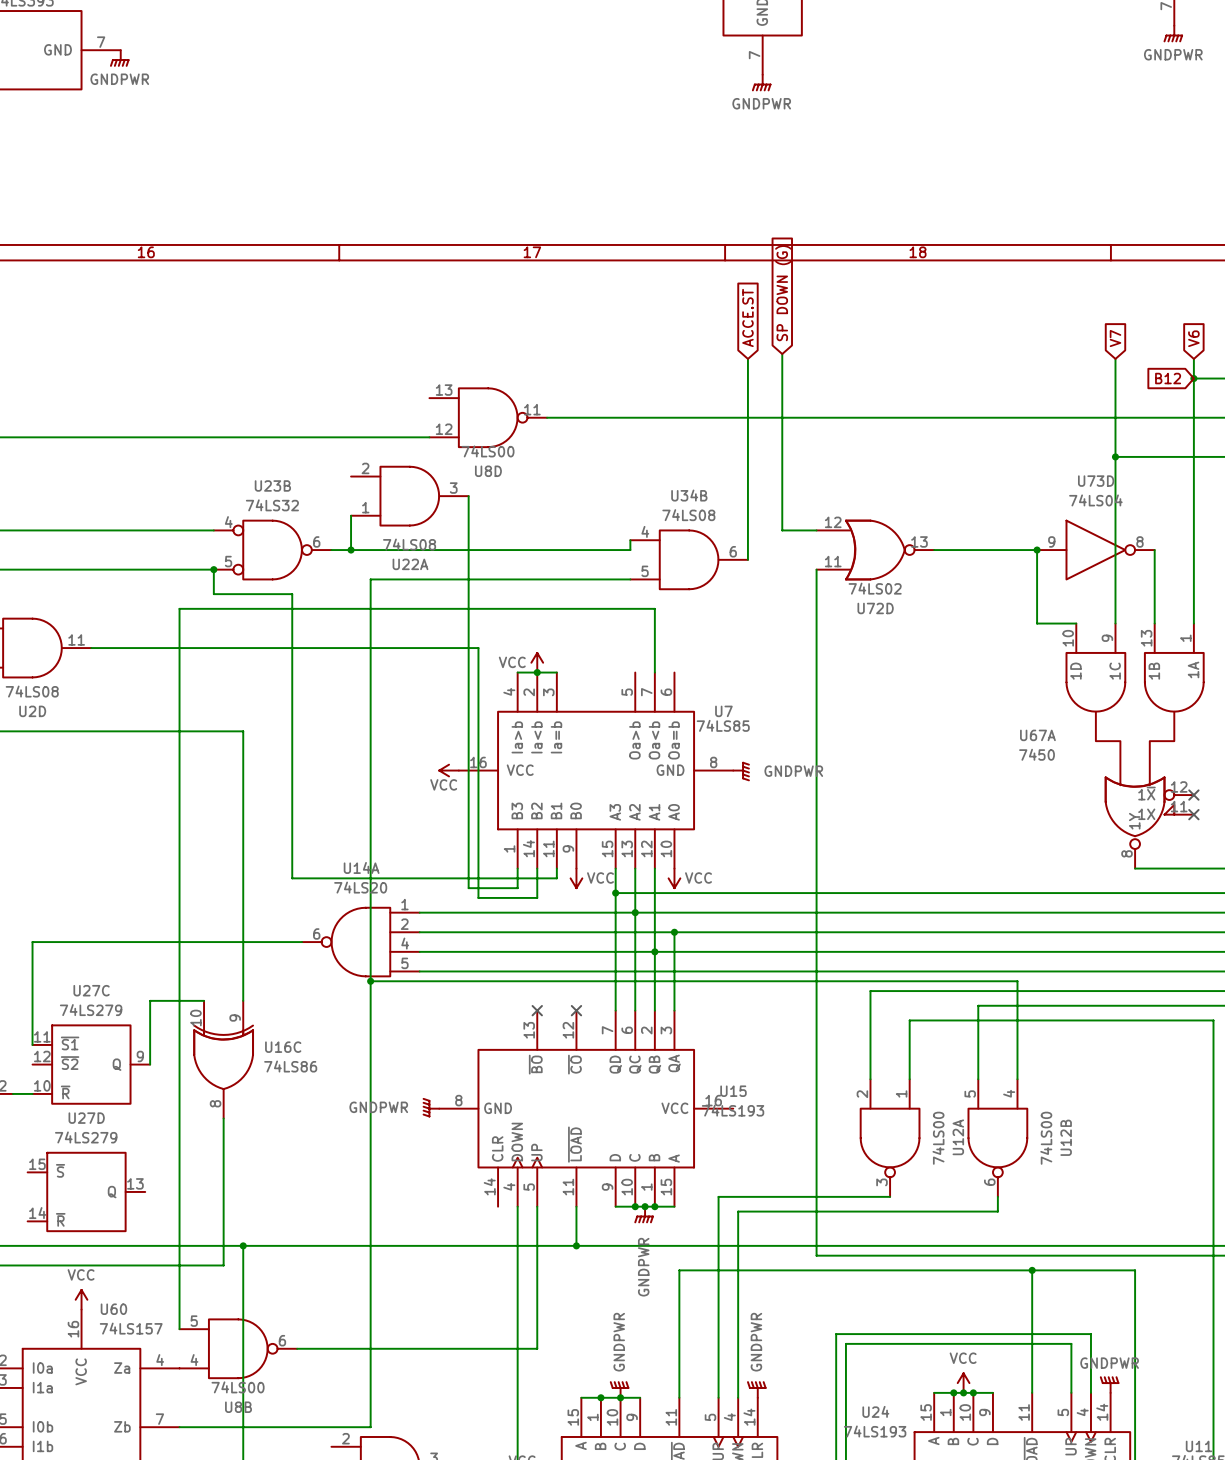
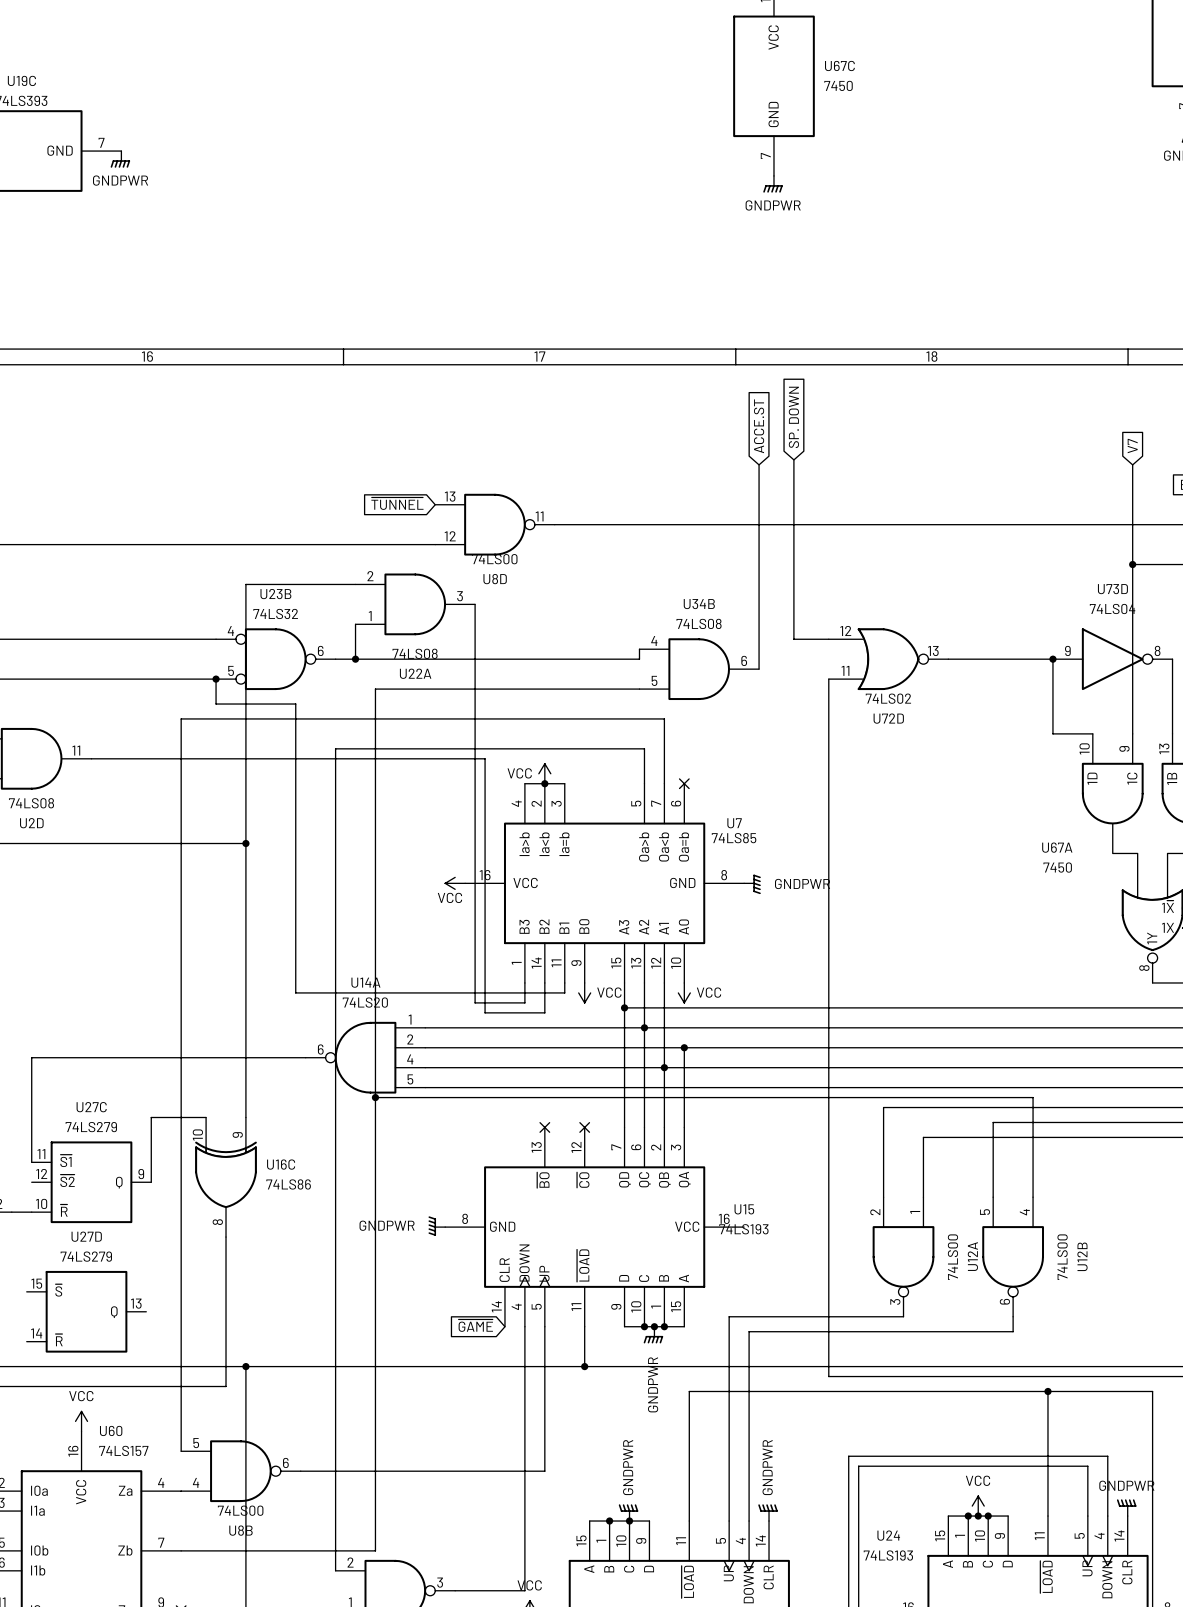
global label: SP DOWN (G) (783, 293) -> SP. DOWN (793, 417)
global label: none -> ~{TUNNEL} (397, 503)
wire: none -> (355, 584) (245, 584) (245, 843)
wire: none -> (644, 783) (644, 748) (335, 748) (335, 1570)
no-connect mark: none -> (684, 783)
junction: none -> (245, 843)
global label: none -> ~{GAME} (475, 1325)

